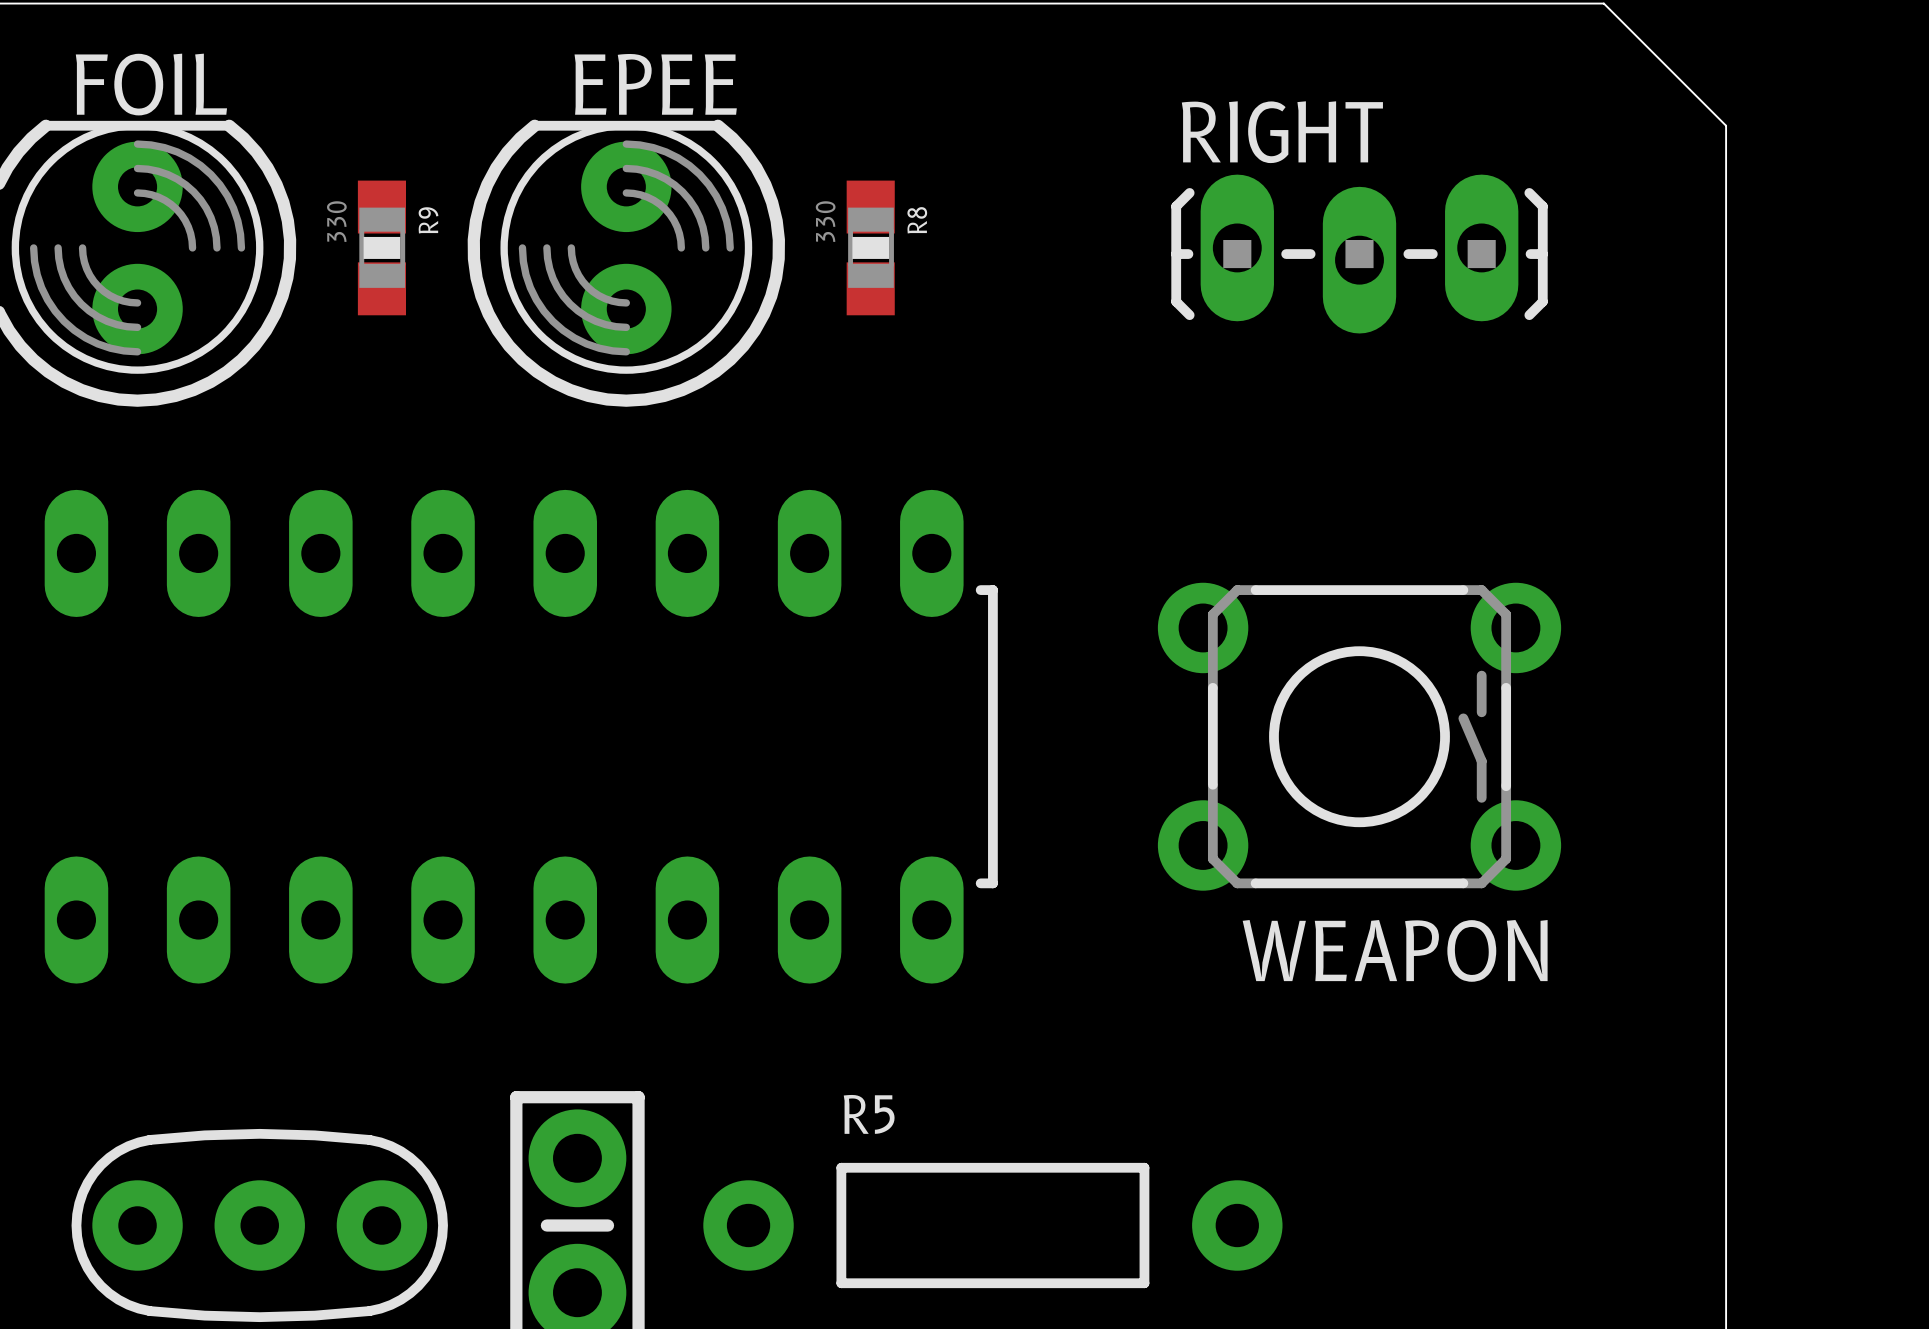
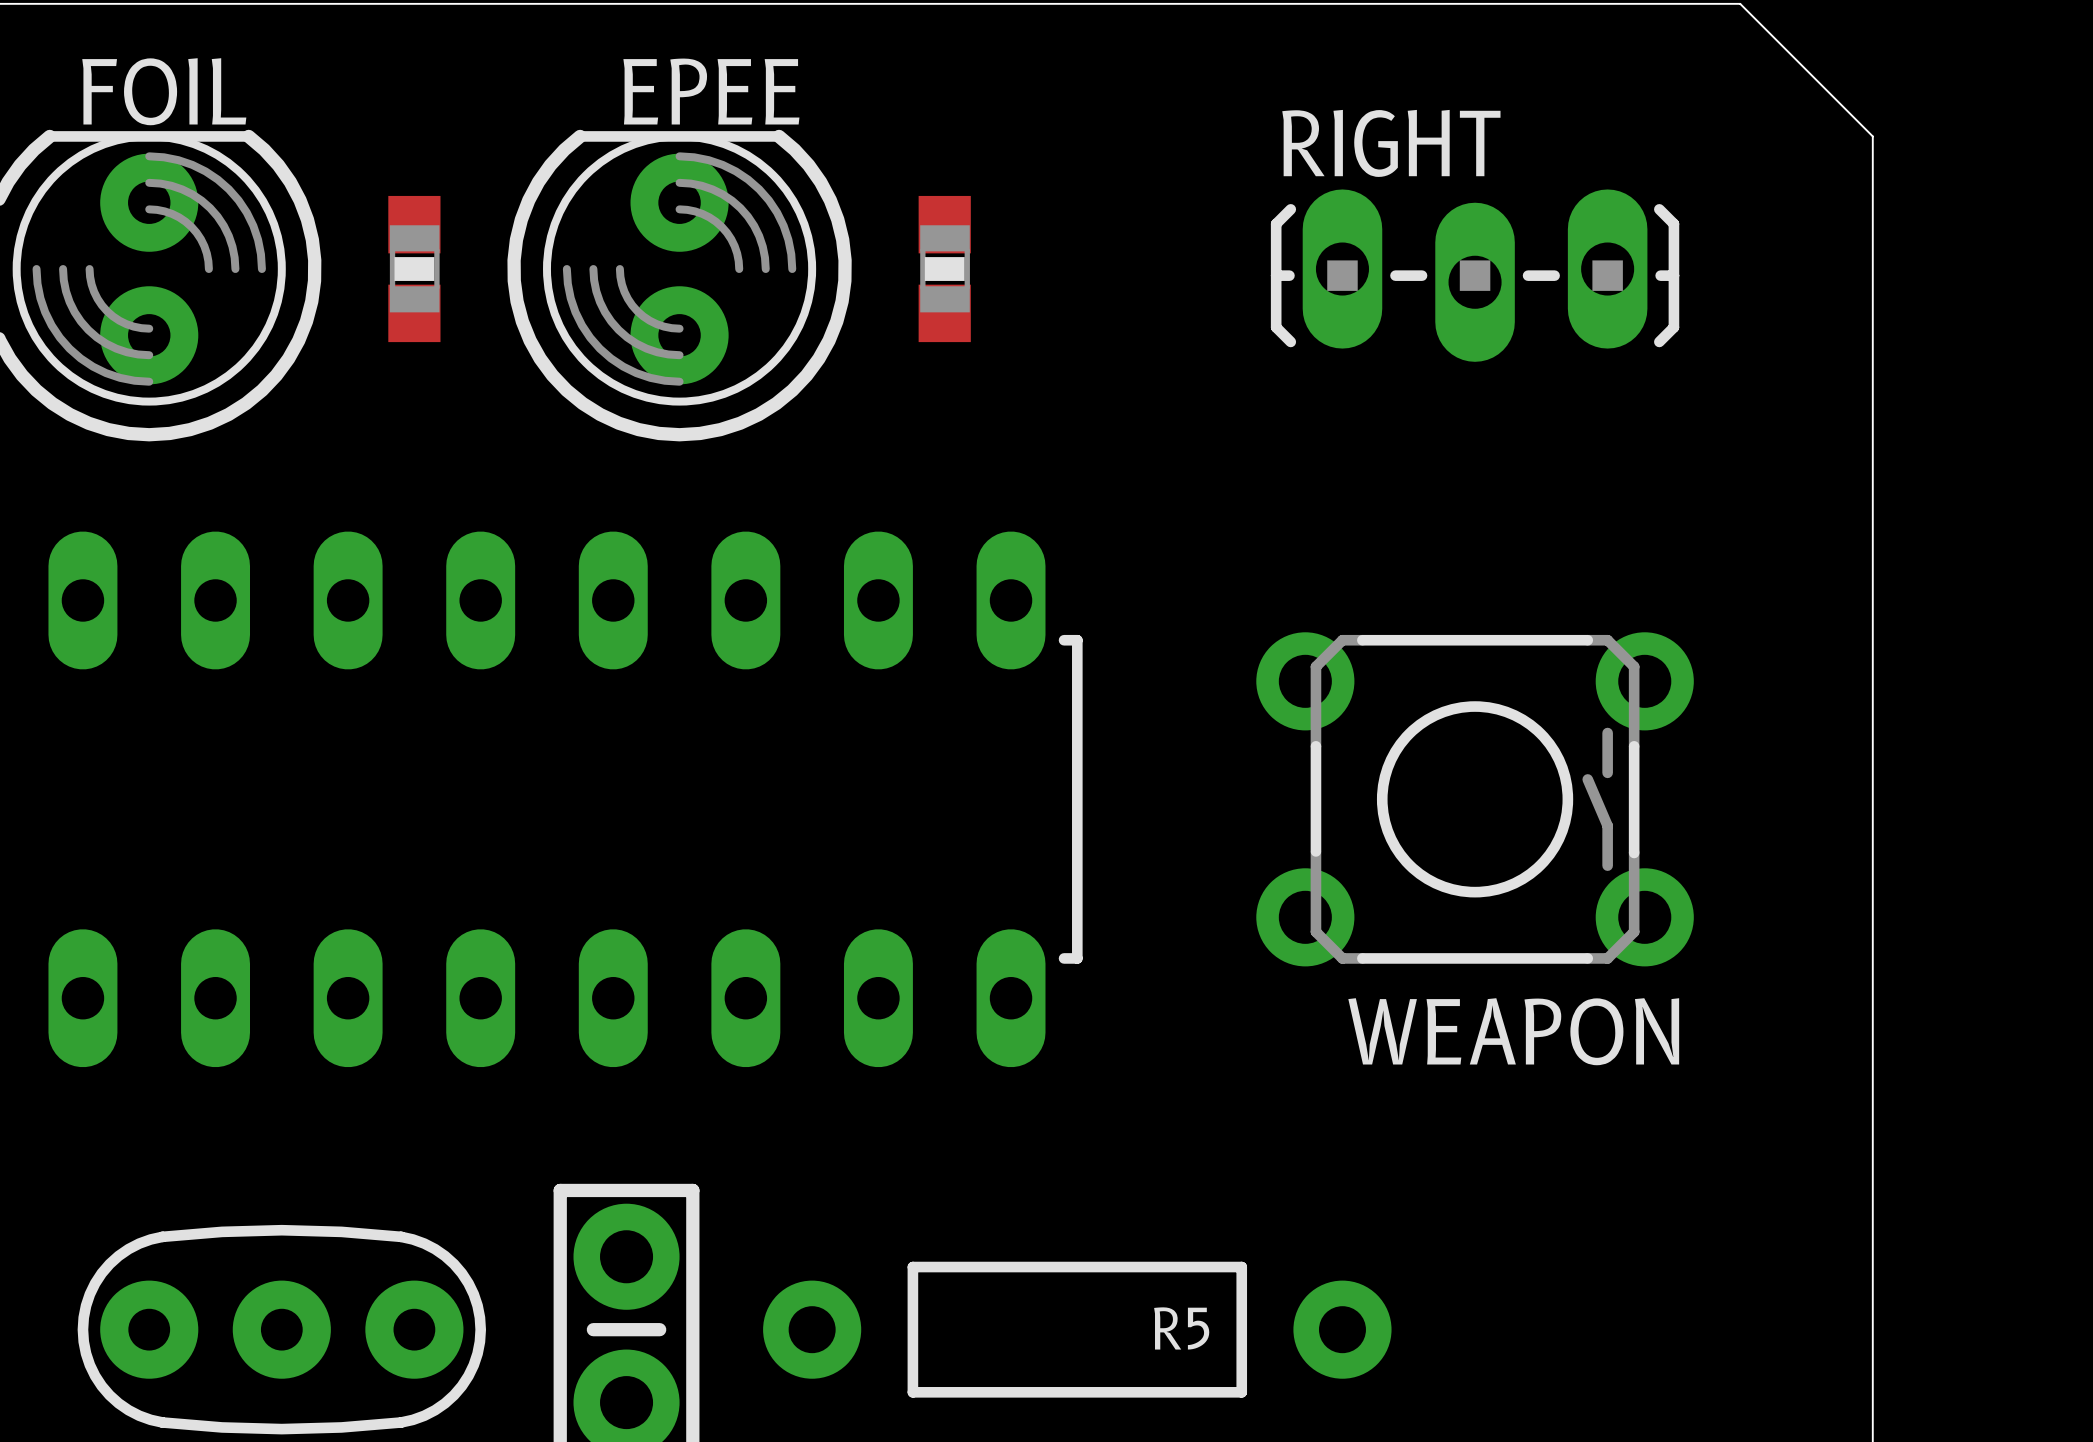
R9 name: R9 (428, 220) -> none
R8 name: R8 (917, 220) -> none
R9 value: 330 (336, 221) -> none
R8 value: 330 (825, 221) -> none
R5 name position: R5 (869, 1114) -> R5 (1181, 1328)

